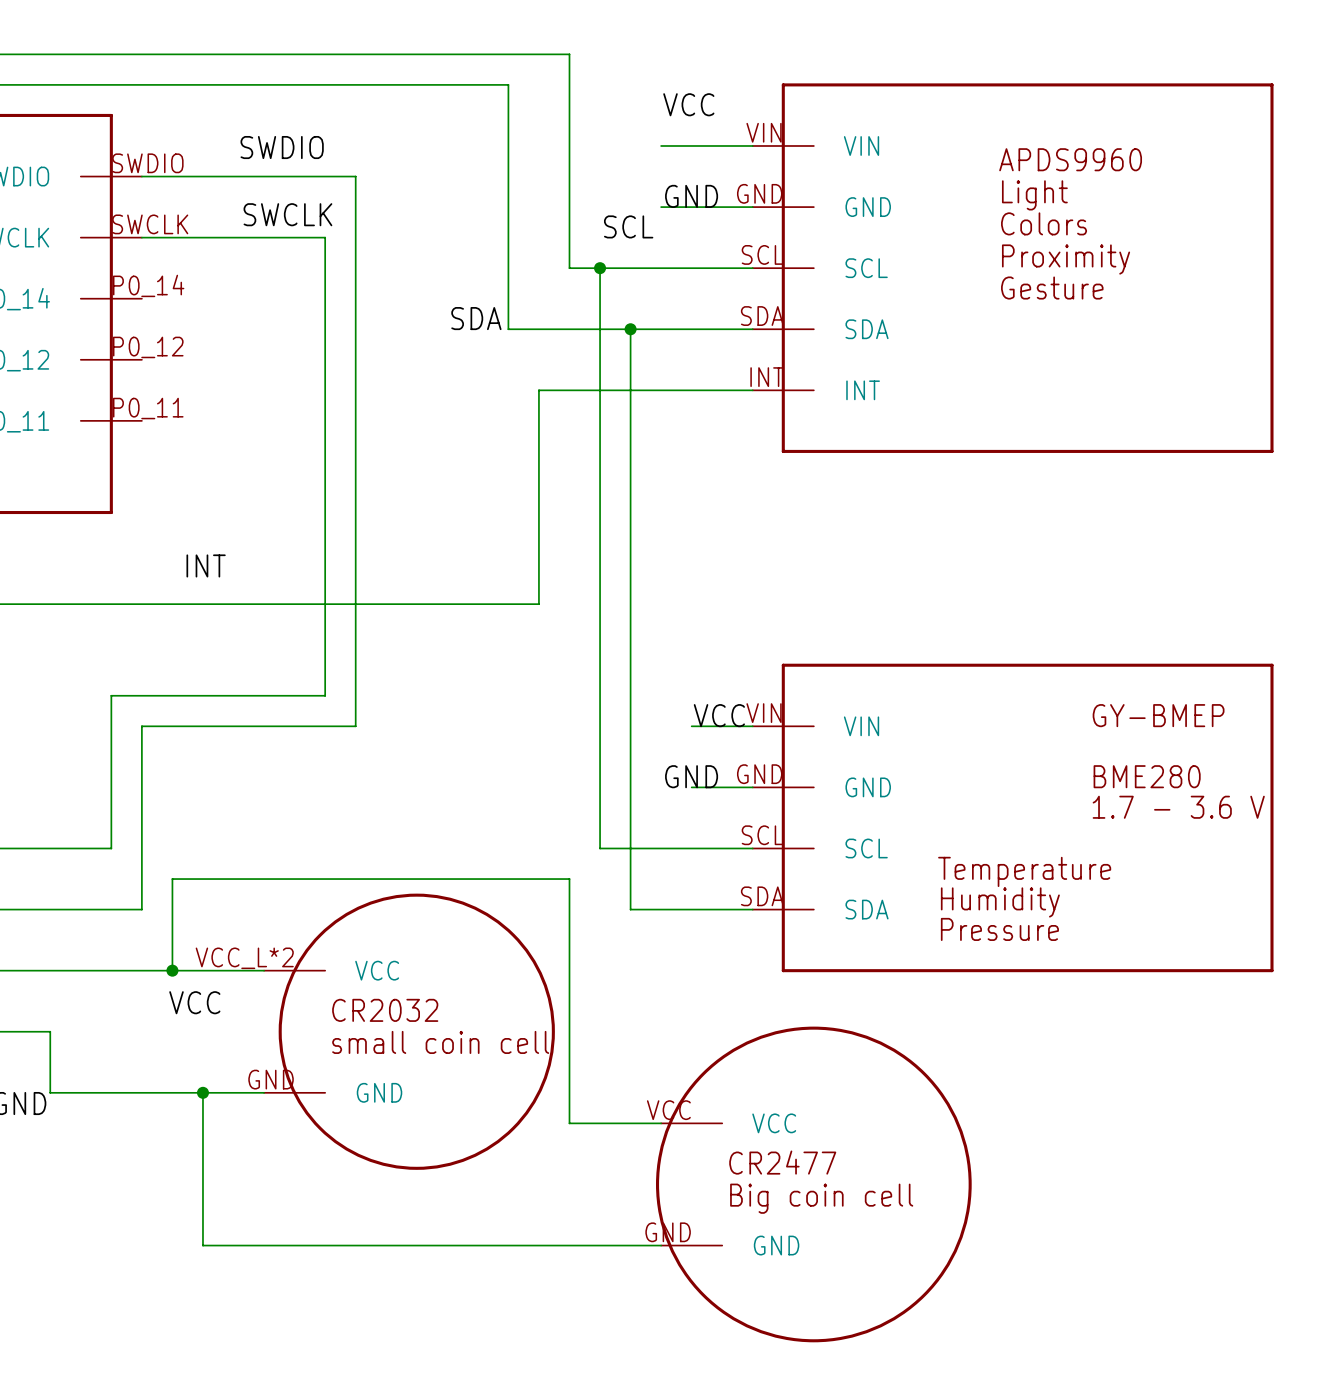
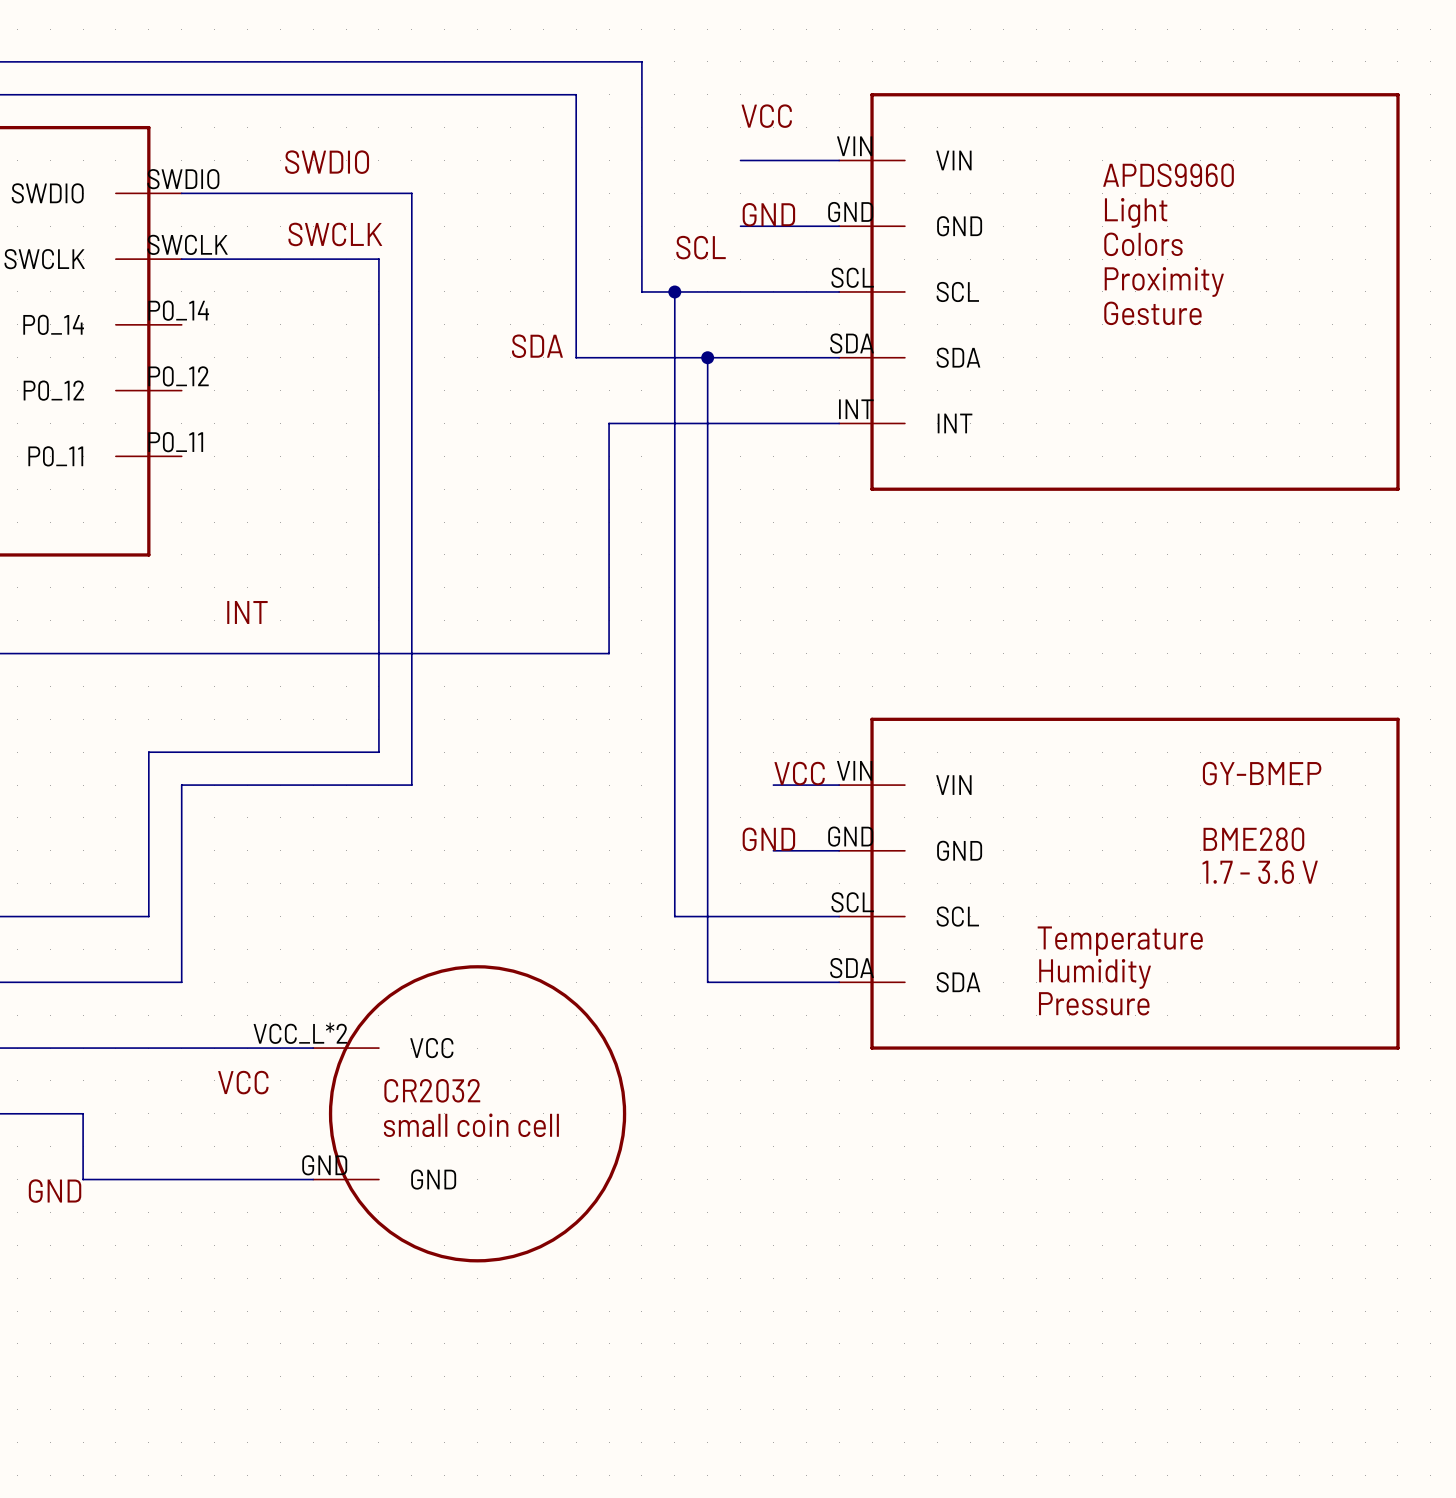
wire: (172, 970) (172, 879) (569, 879) (569, 1123) (661, 1123) -> none
junction: (172, 970) -> none
wire: (202, 1092) (202, 1245) (661, 1245) -> none
junction: (202, 1092) -> none
part: (813, 1184) -> none

